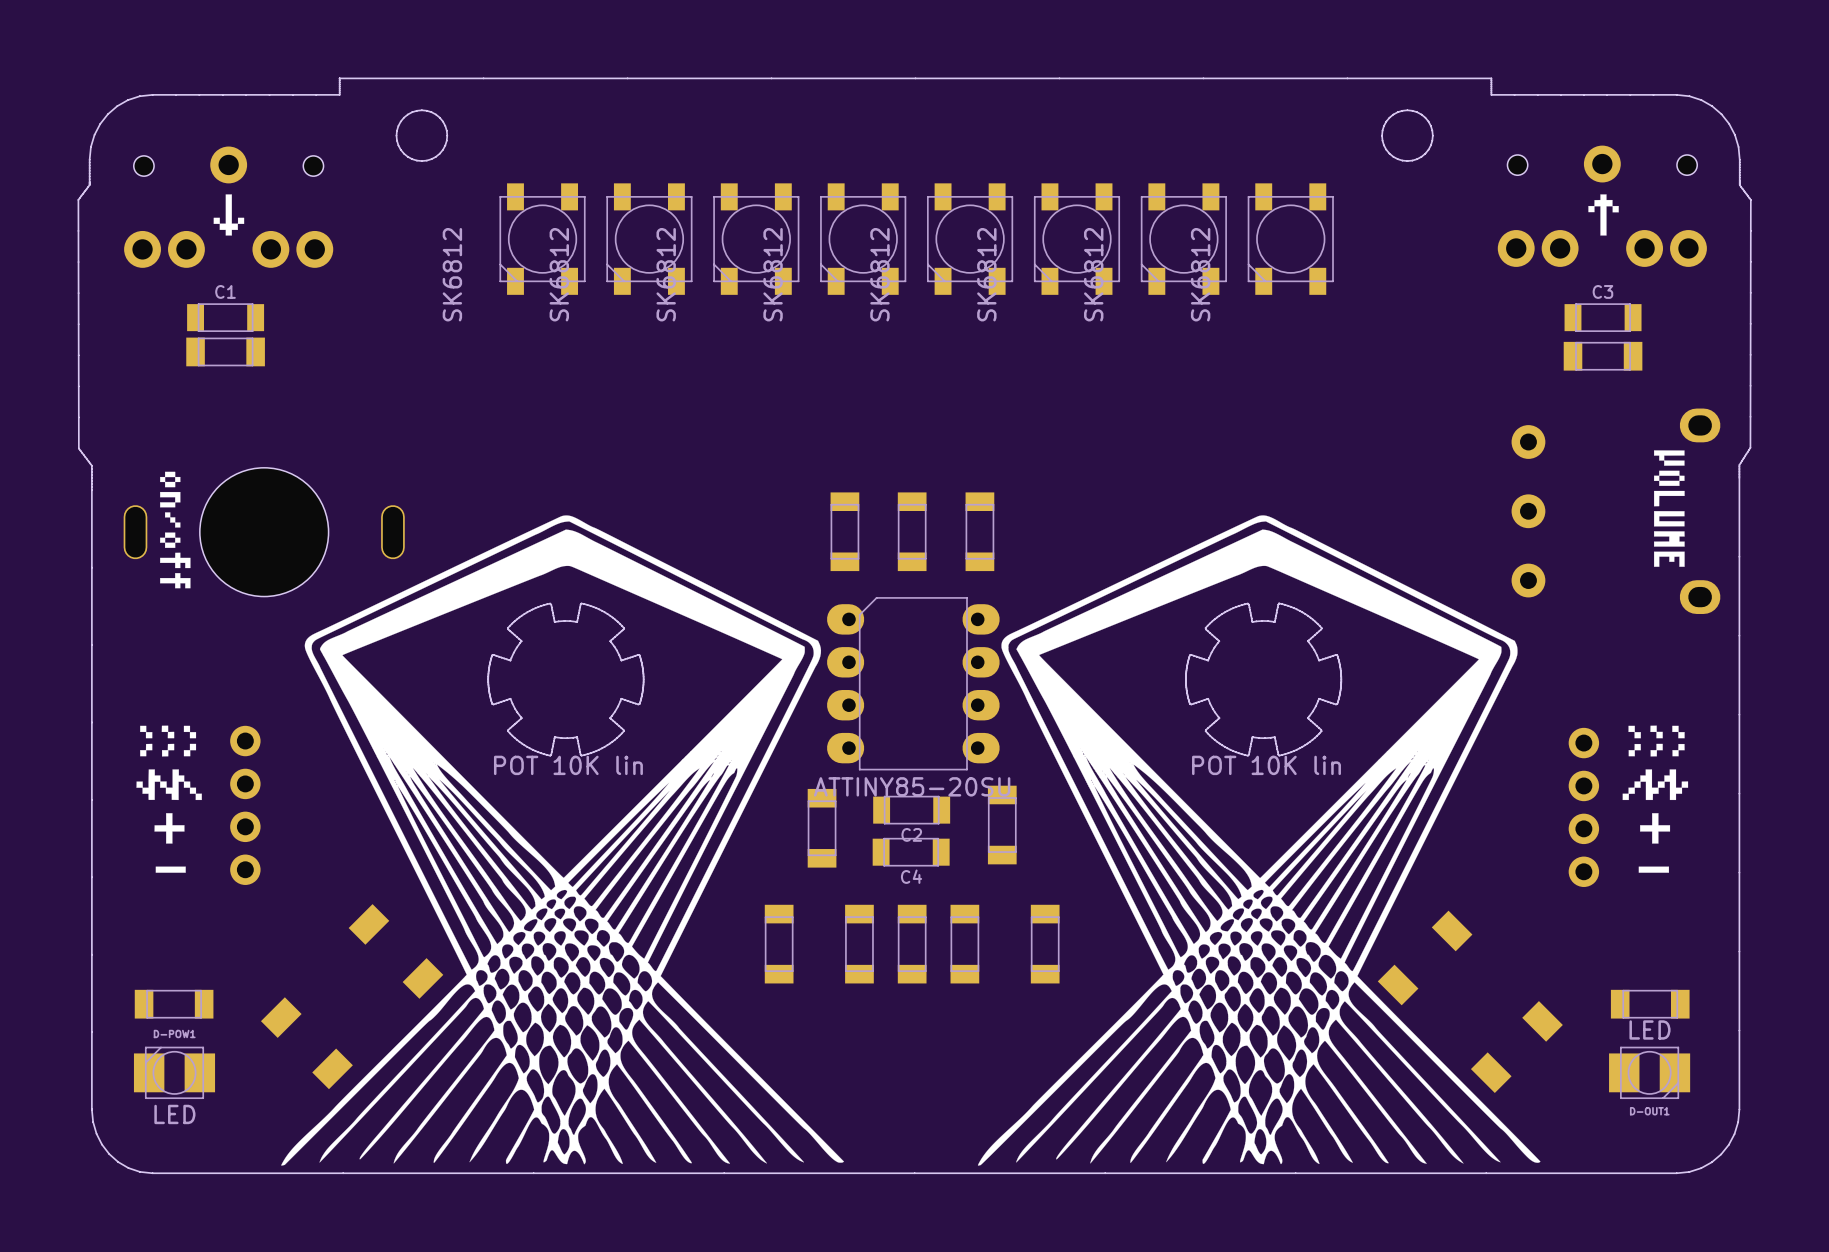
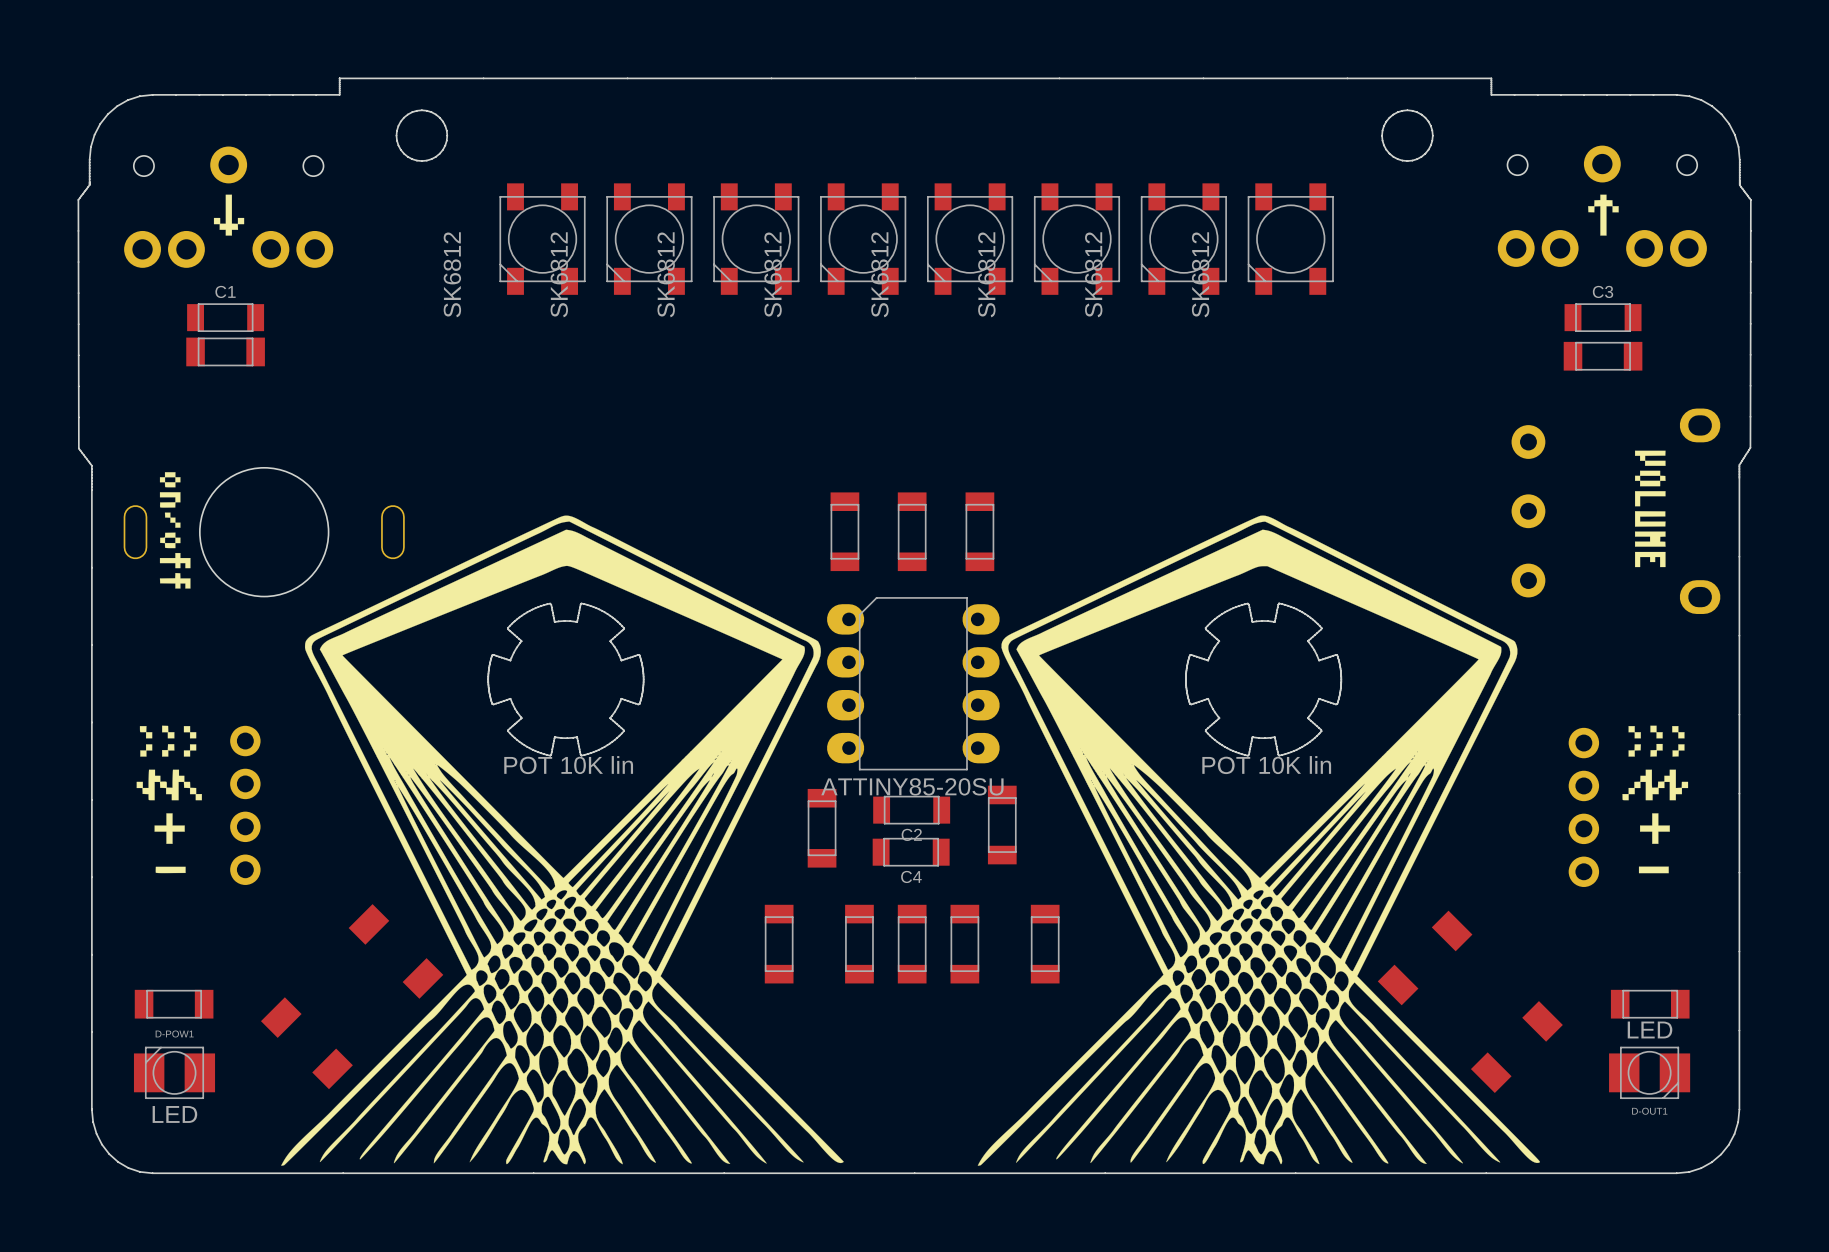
drawing shape: [77, 77, 1752, 1175] -> [77, 77, 1752, 1175]

